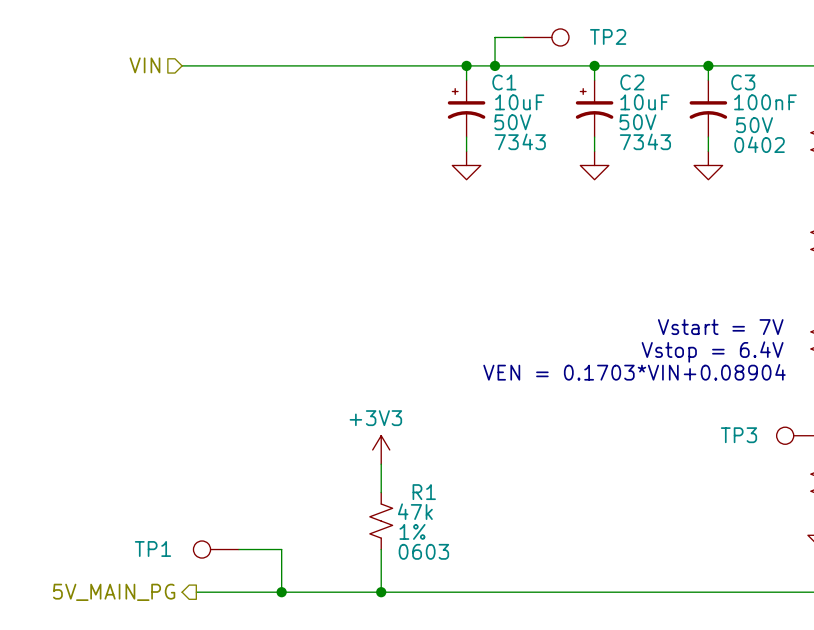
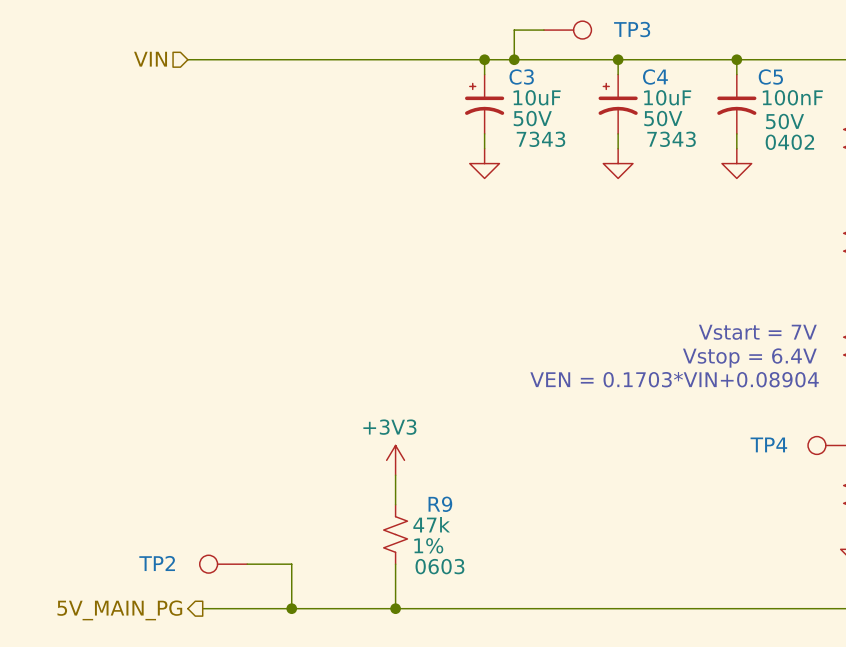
TP2 name: TP2 (608, 36) -> TP3 (632, 29)
C1 name: C1 (504, 82) -> C3 (521, 76)
C2 name: C2 (632, 82) -> C4 (655, 76)
C3 name: C3 (743, 82) -> C5 (770, 76)
TP3 name: TP3 (738, 435) -> TP4 (768, 444)
R1 name: R1 (424, 492) -> R9 (440, 504)
TP1 name: TP1 (152, 548) -> TP2 (157, 563)

